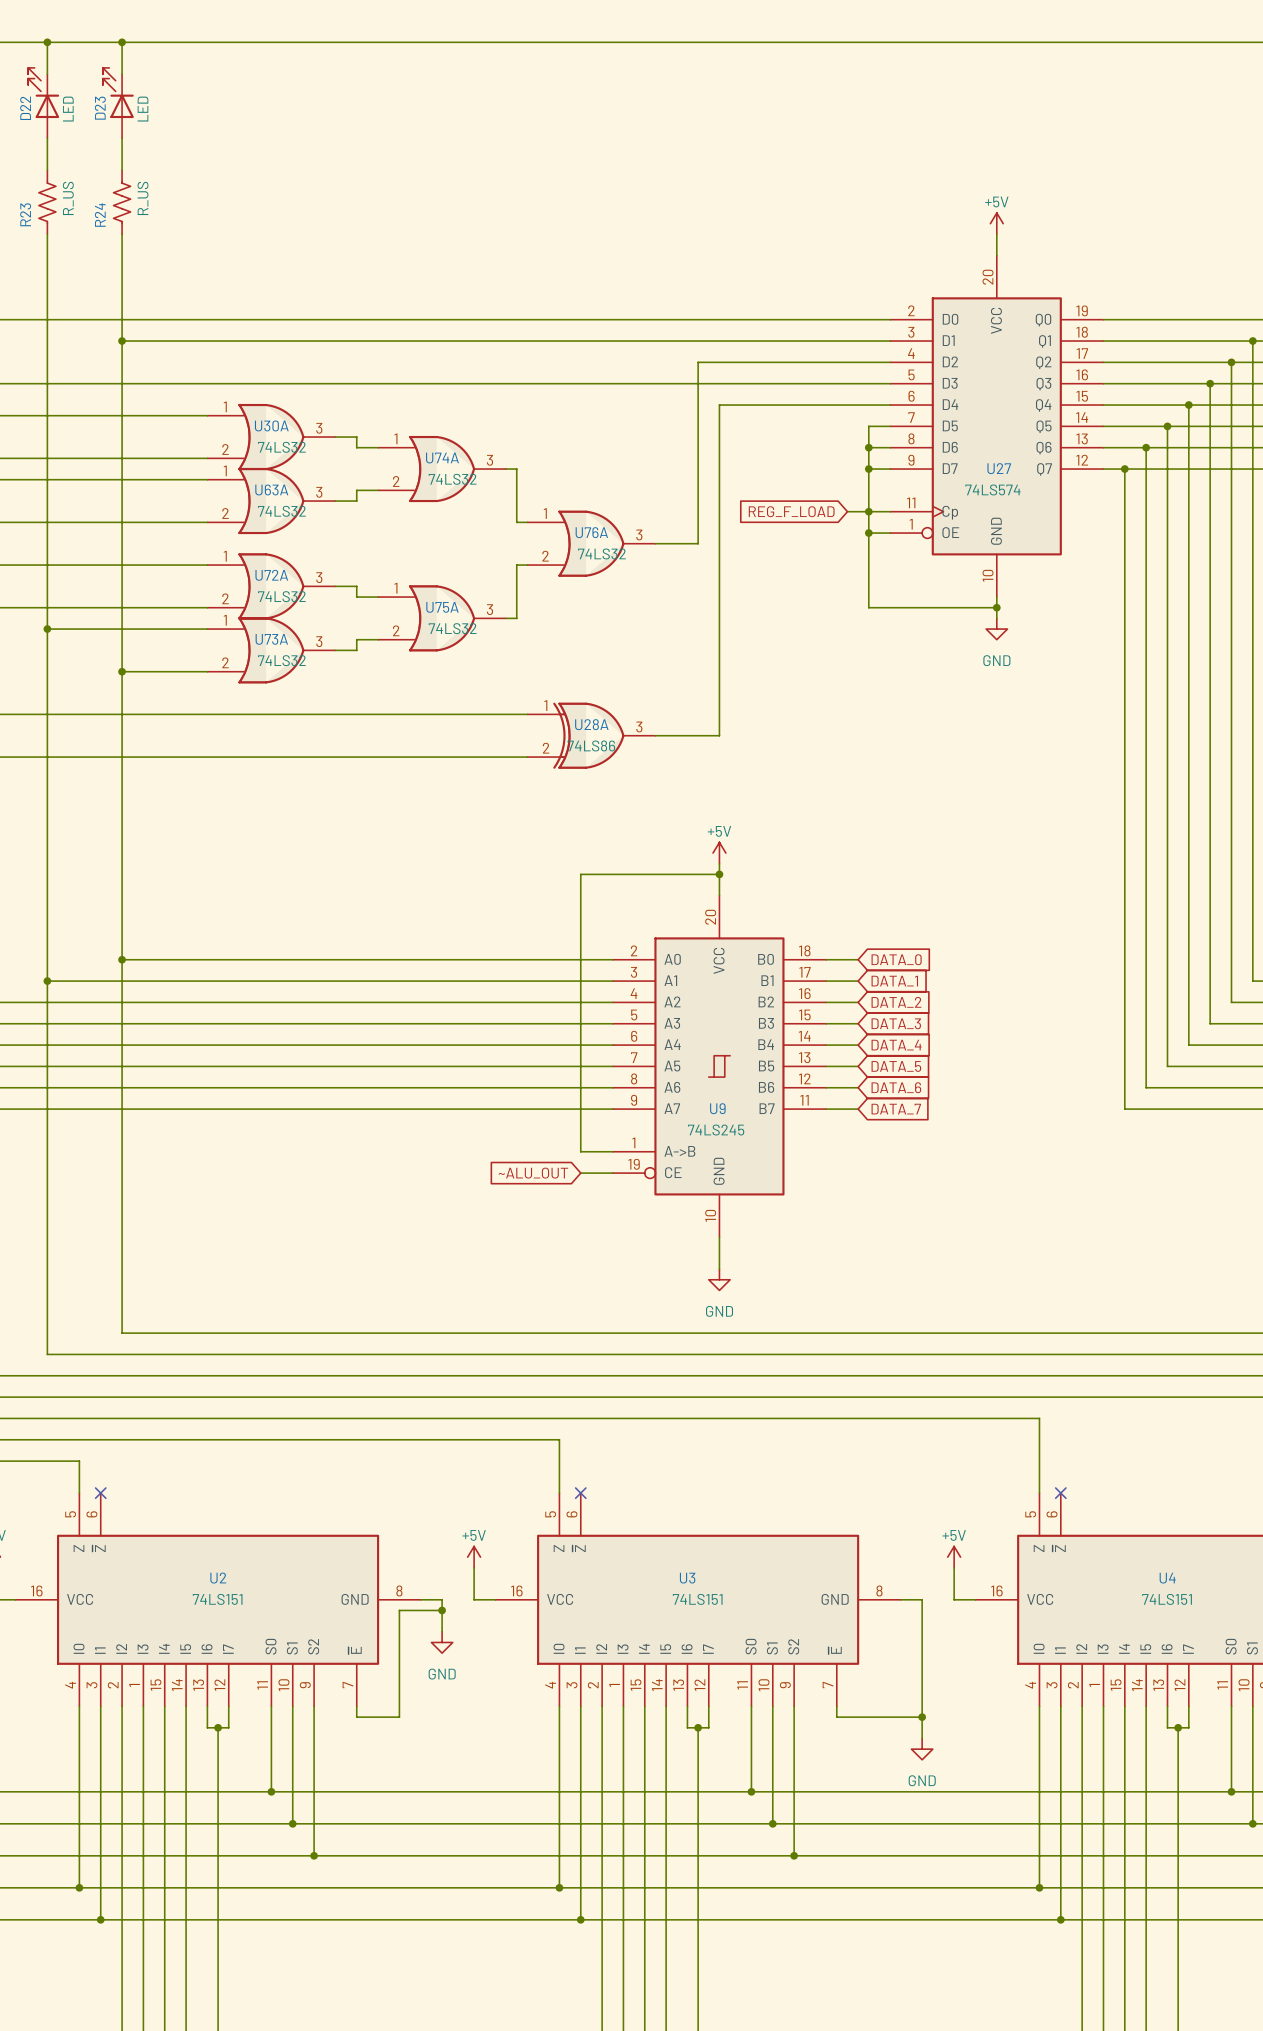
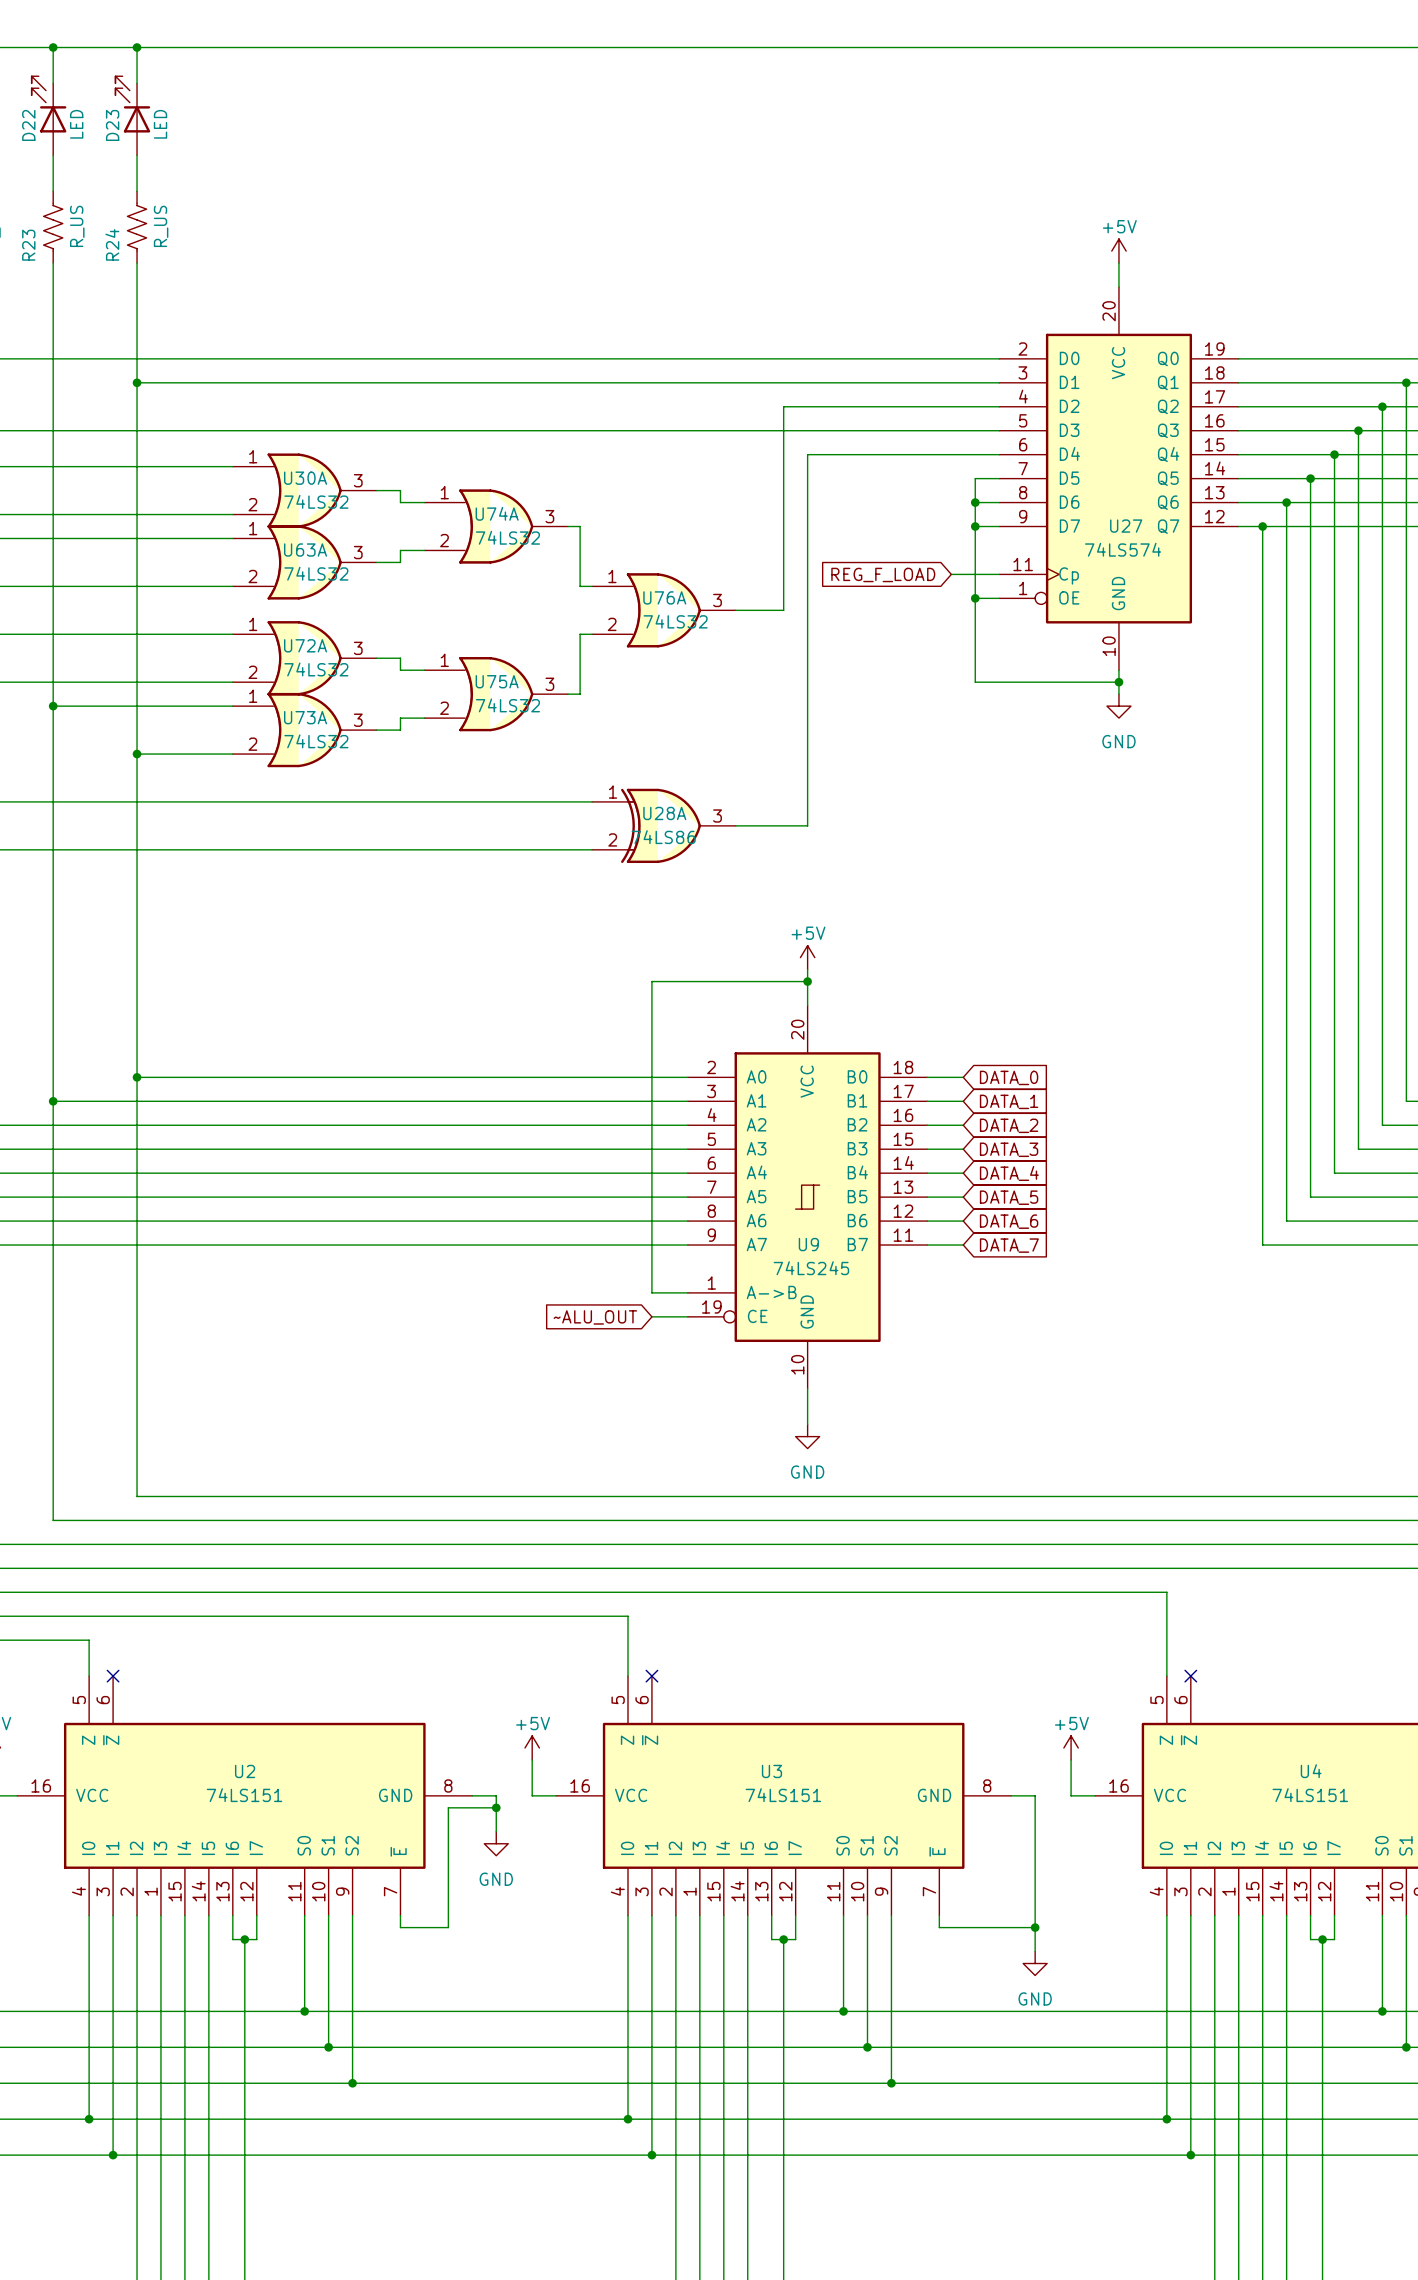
junction: (868, 511) -> none

